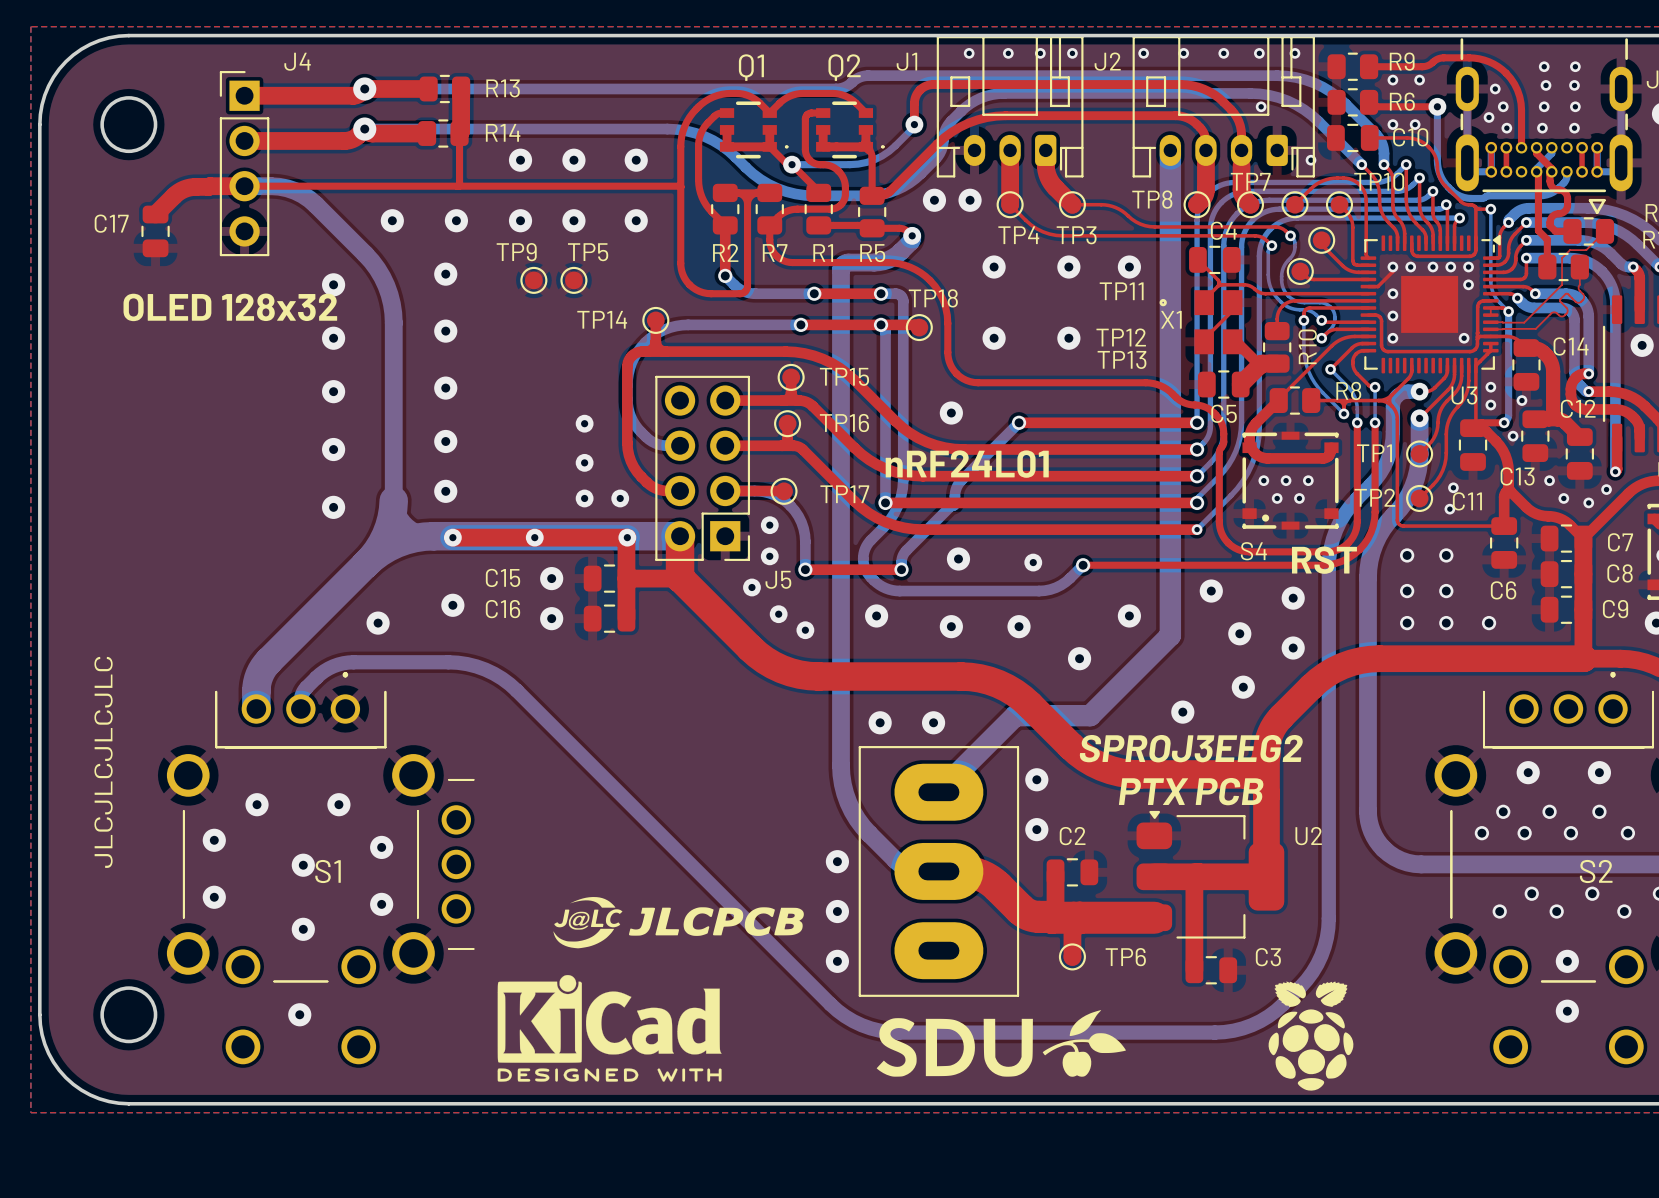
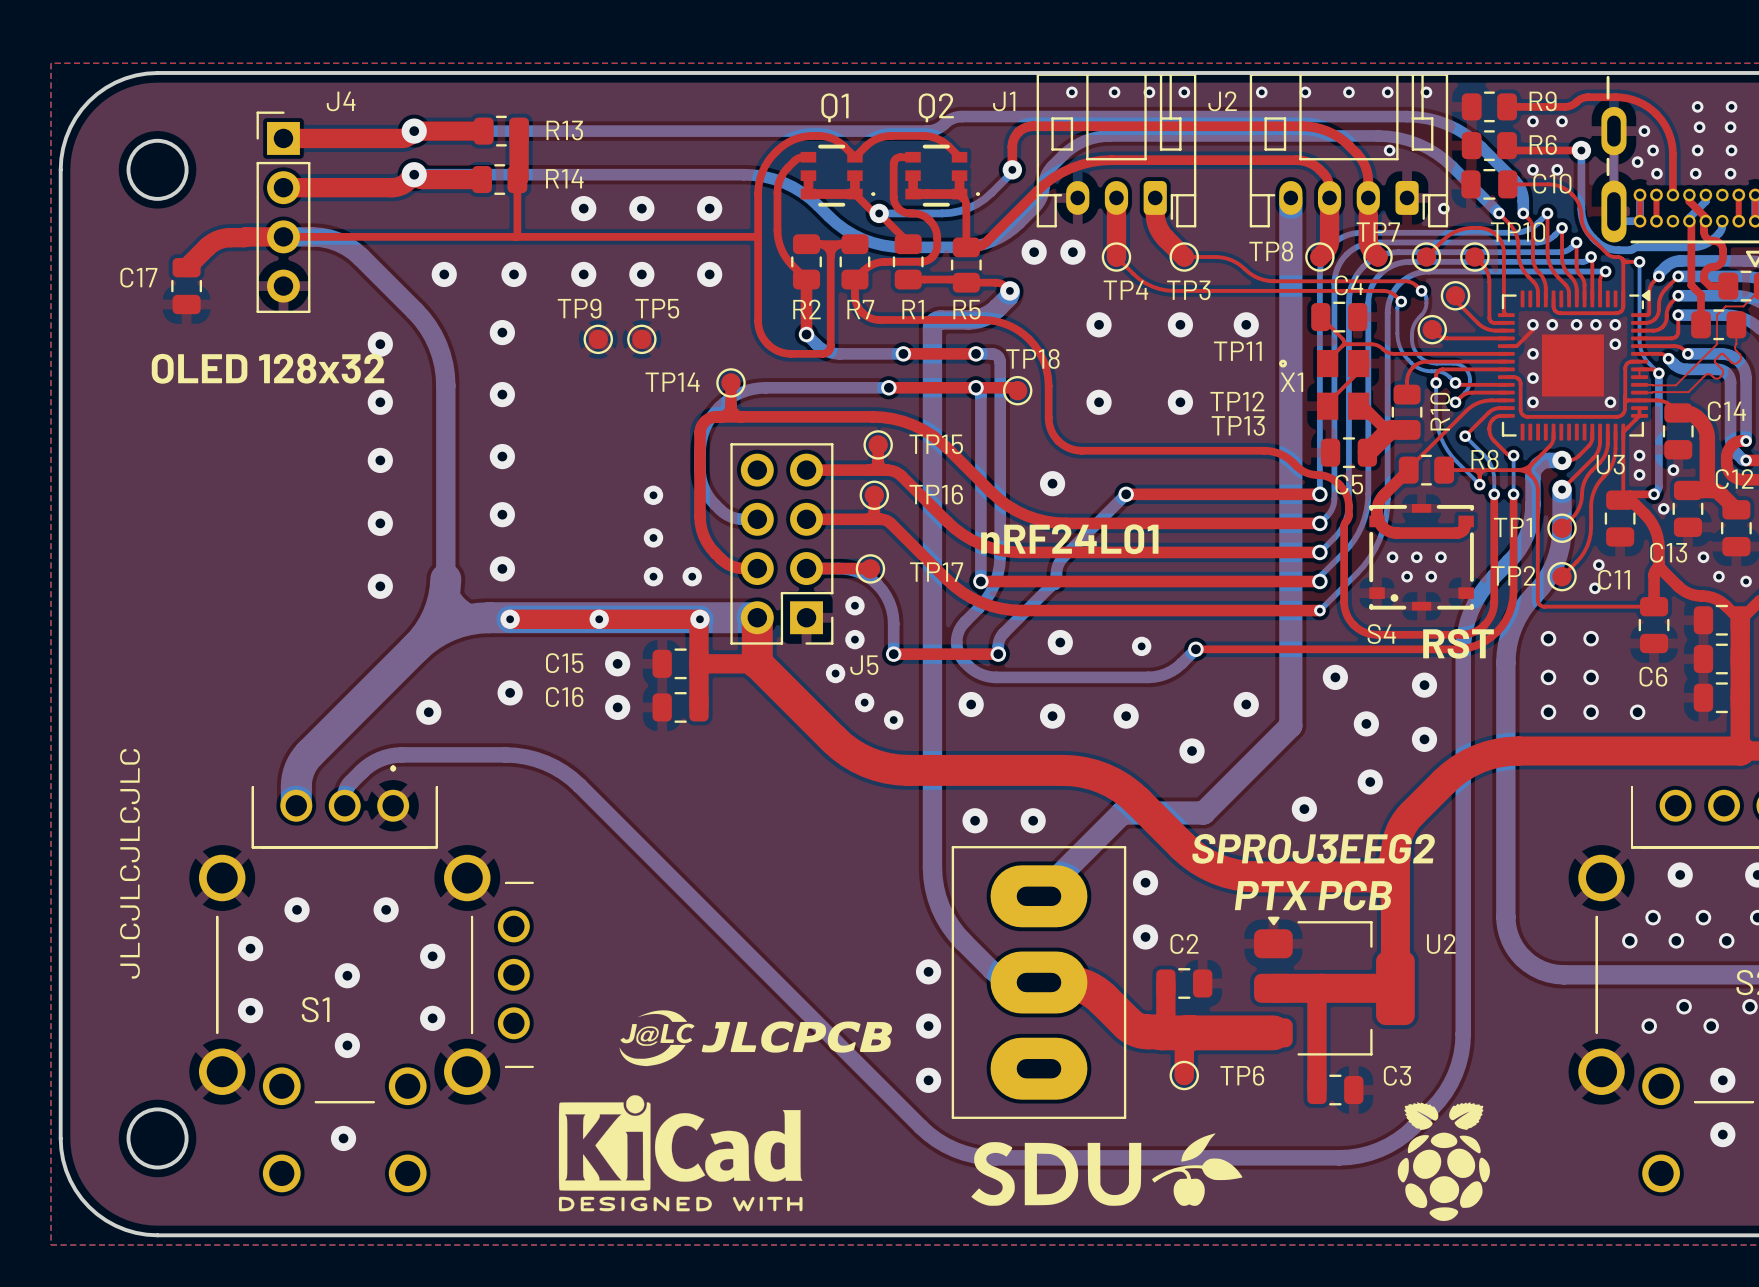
S1 name position: S1 (328, 871) -> S1 (315, 1009)

